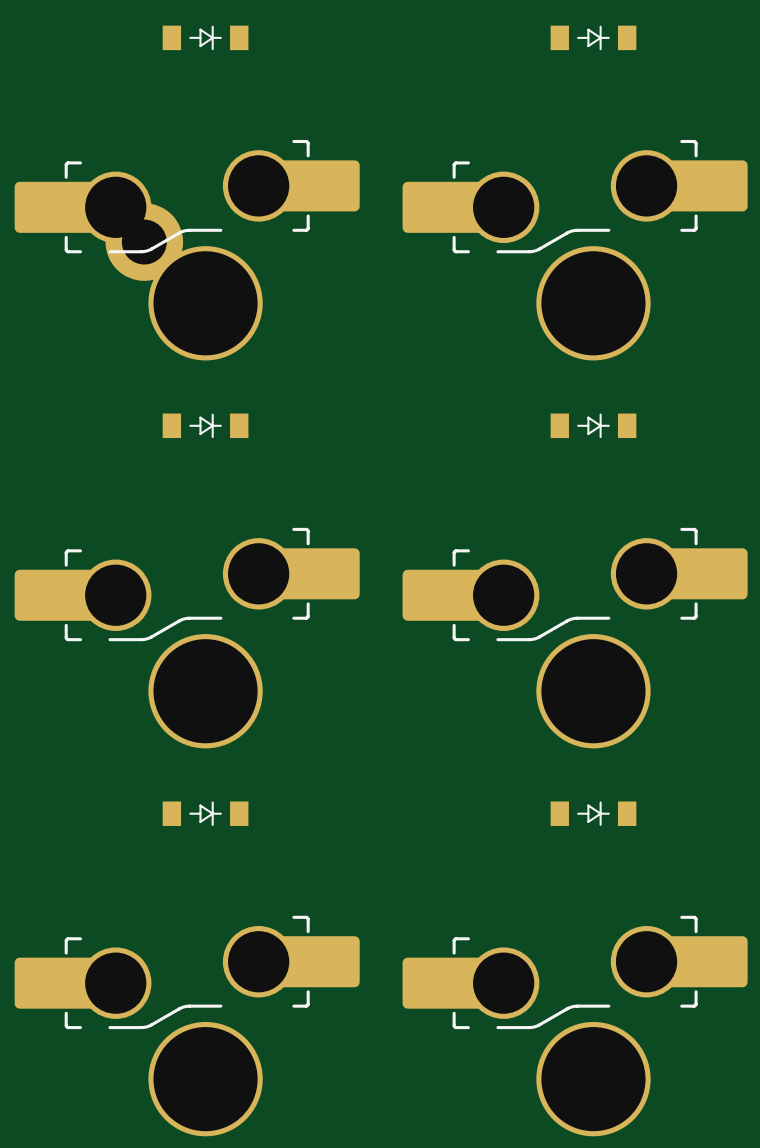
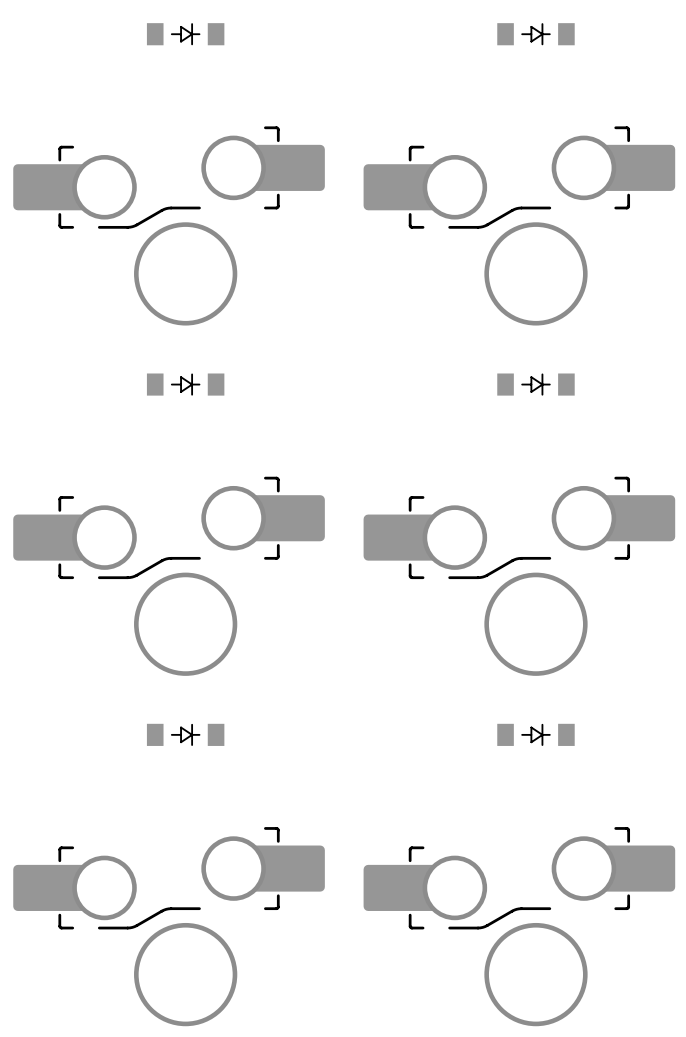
part: (144, 242) -> none

